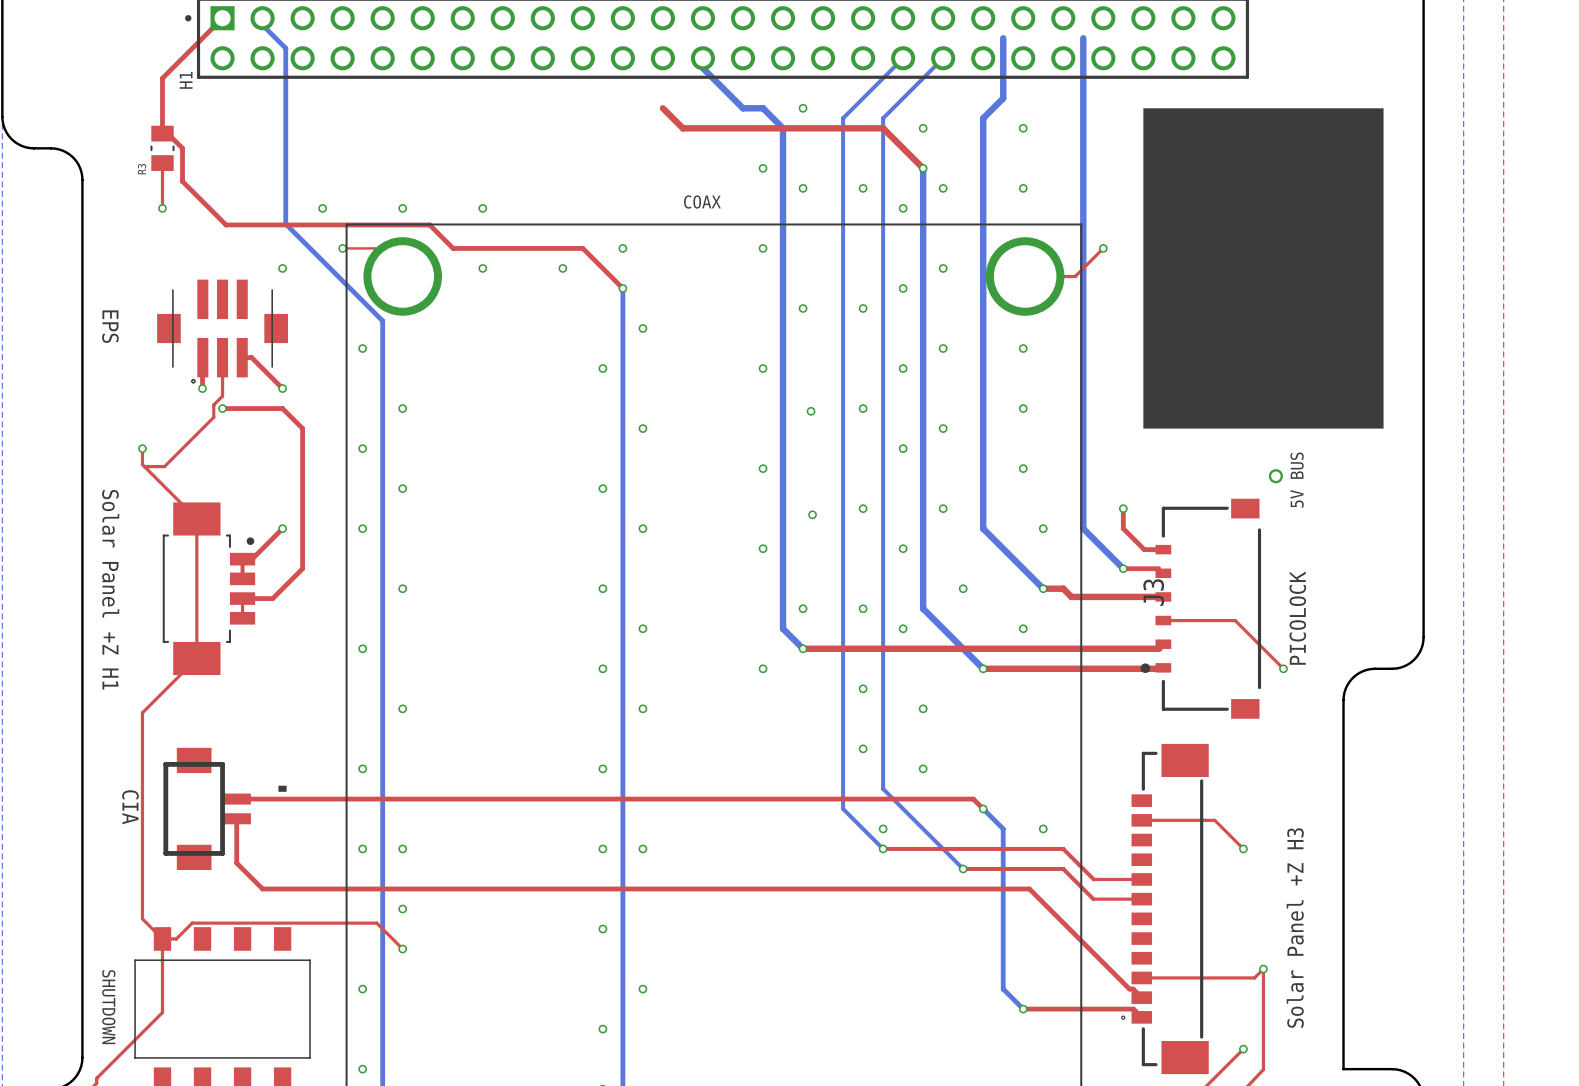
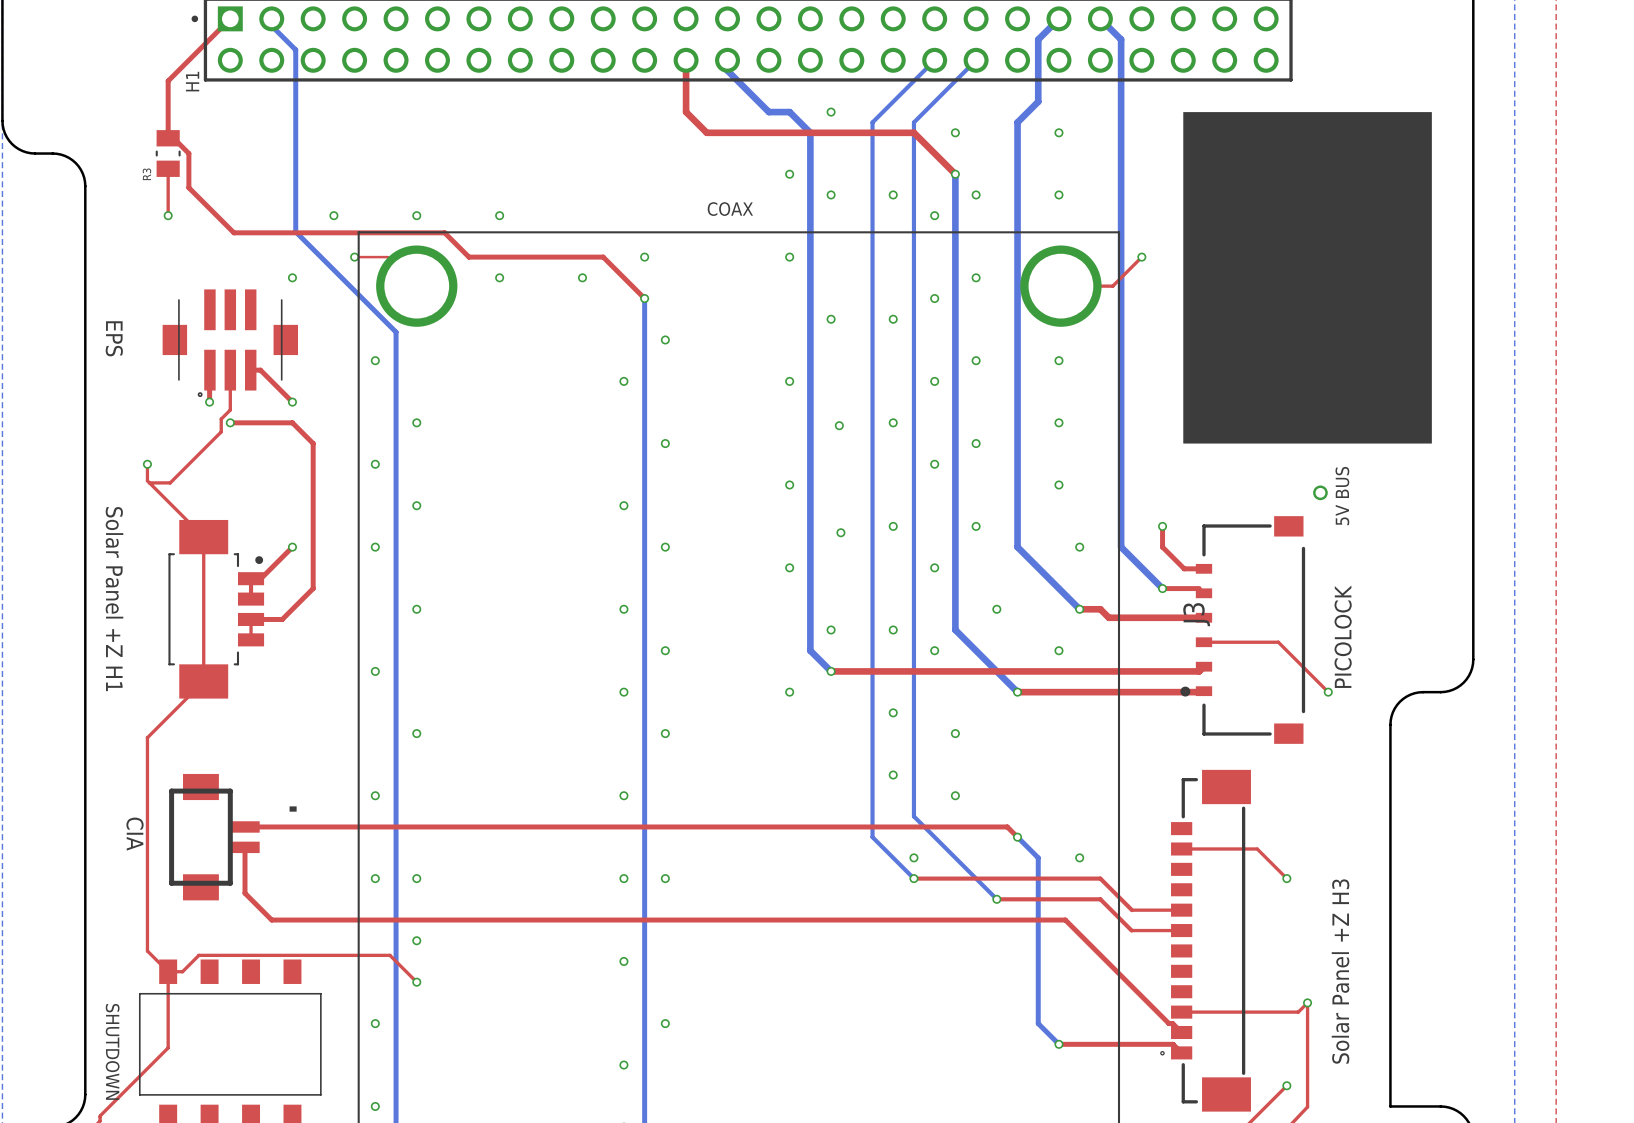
bottom track: none -> (1058, 18) (1038, 39)
bottom track: none -> (1100, 18) (1121, 39)
top track: none -> (686, 60) (686, 112)

